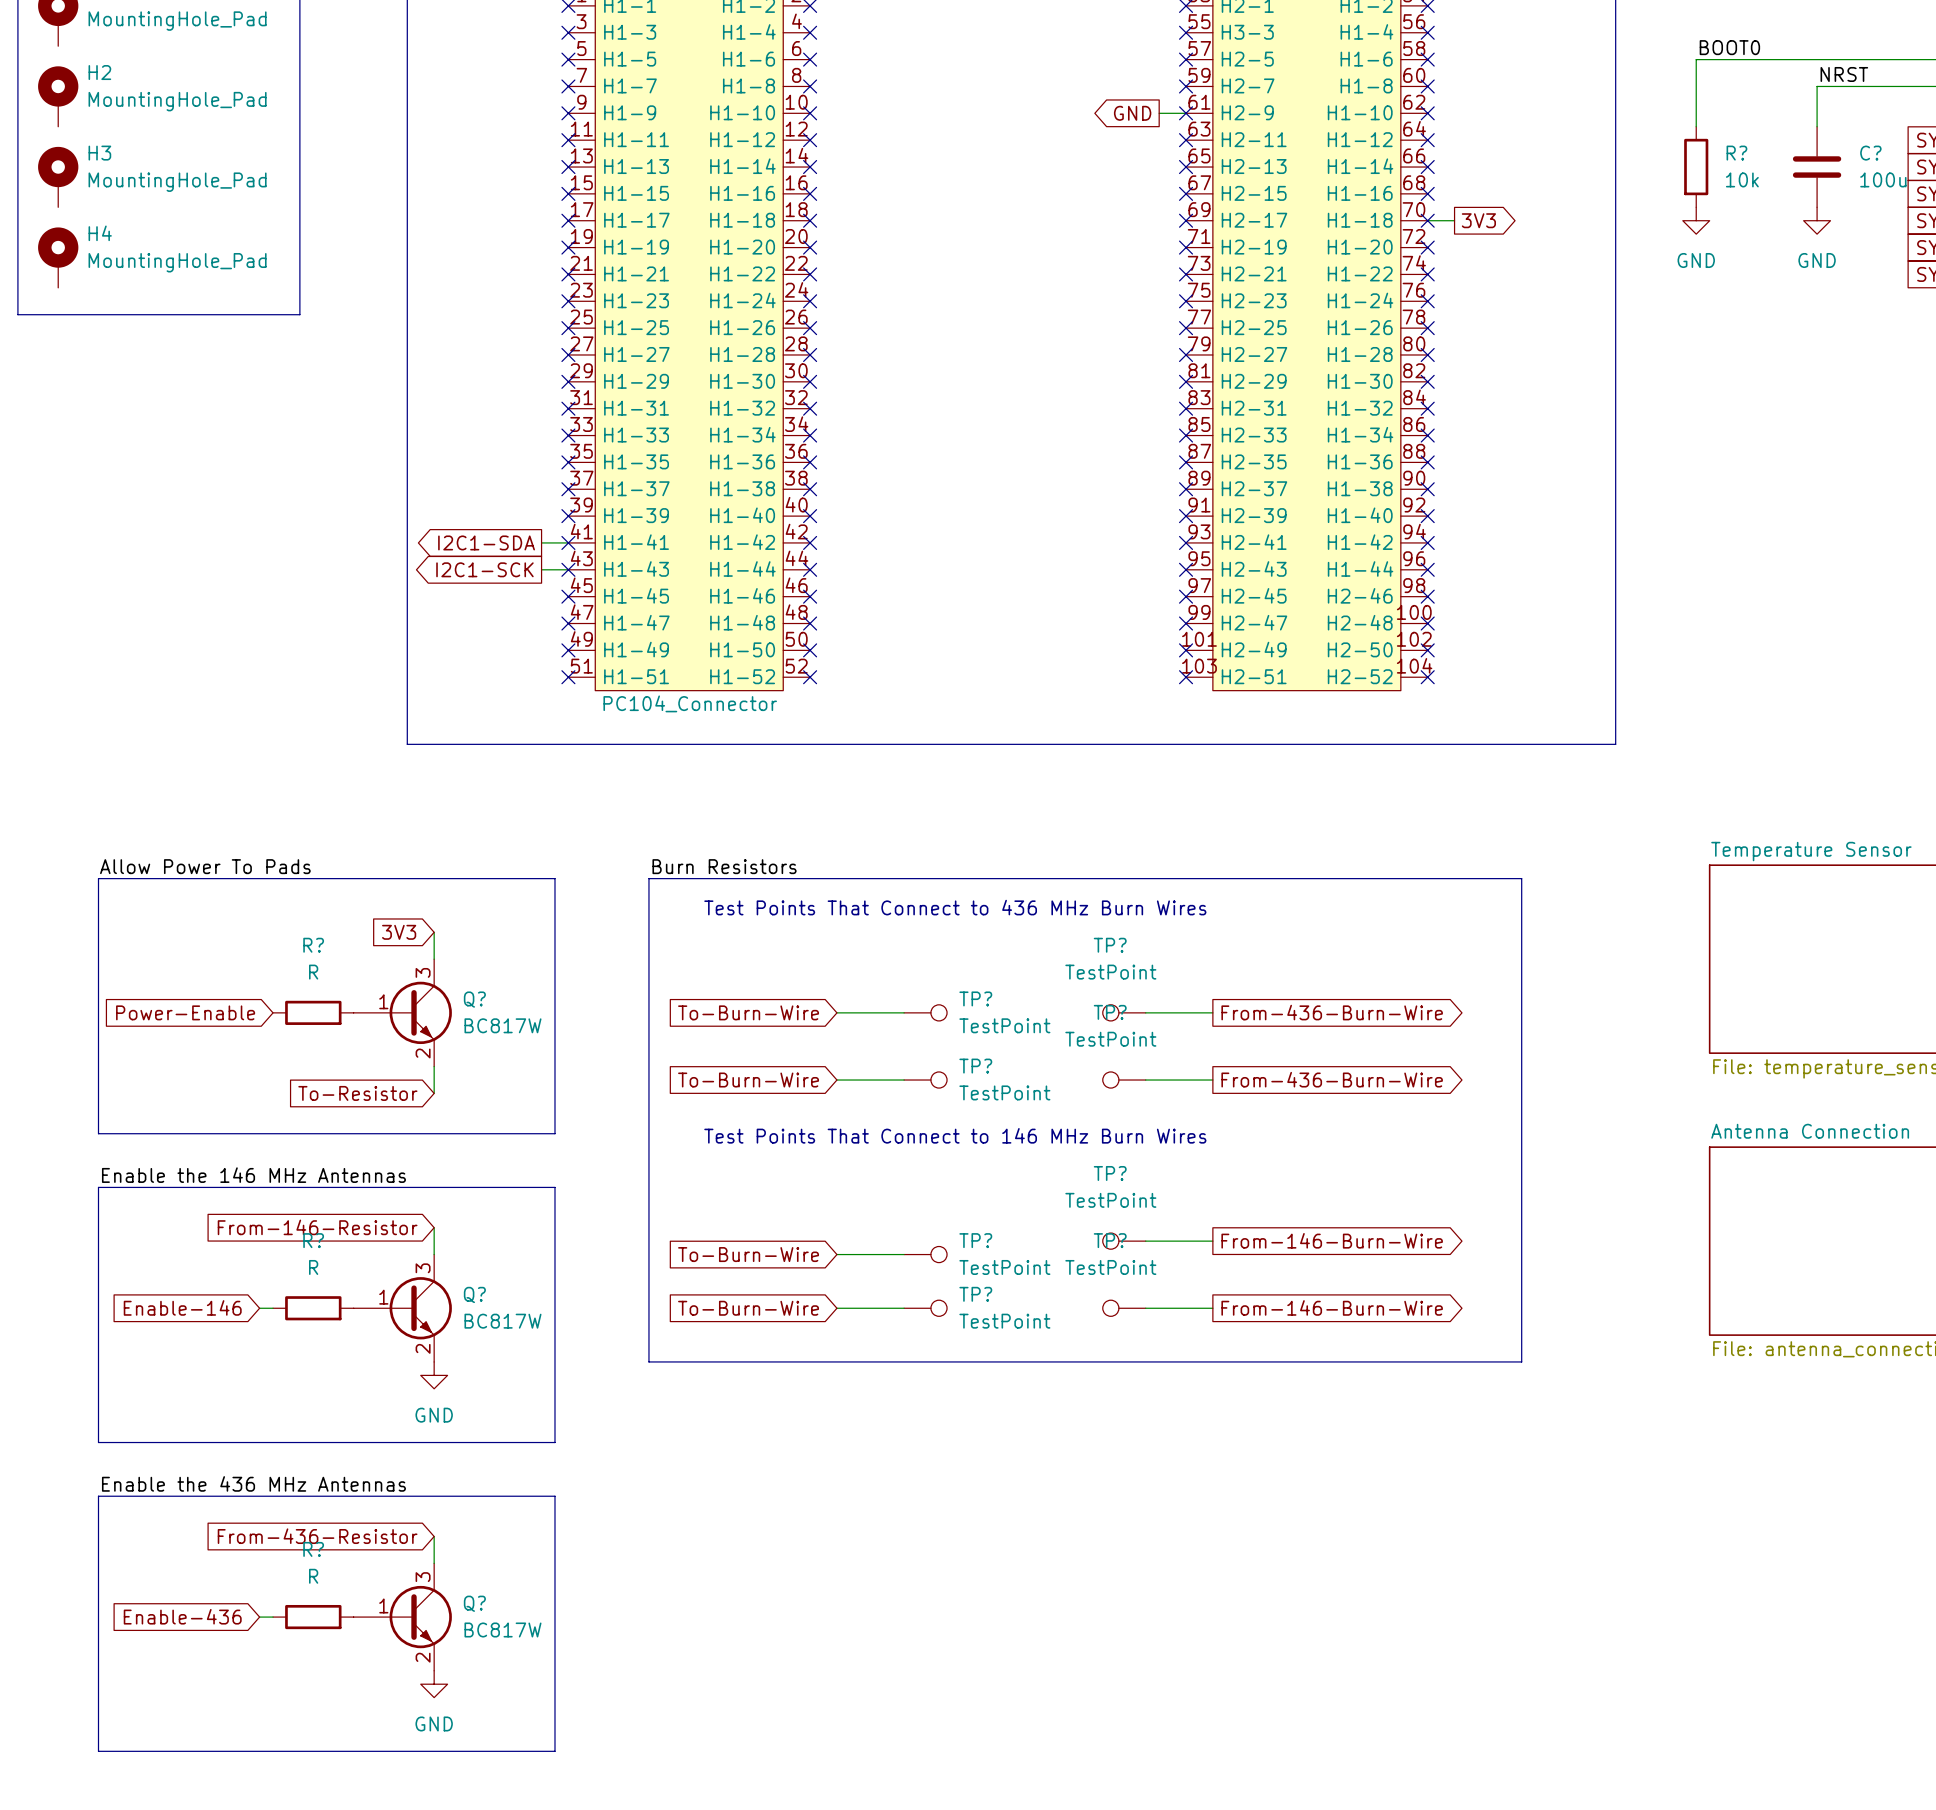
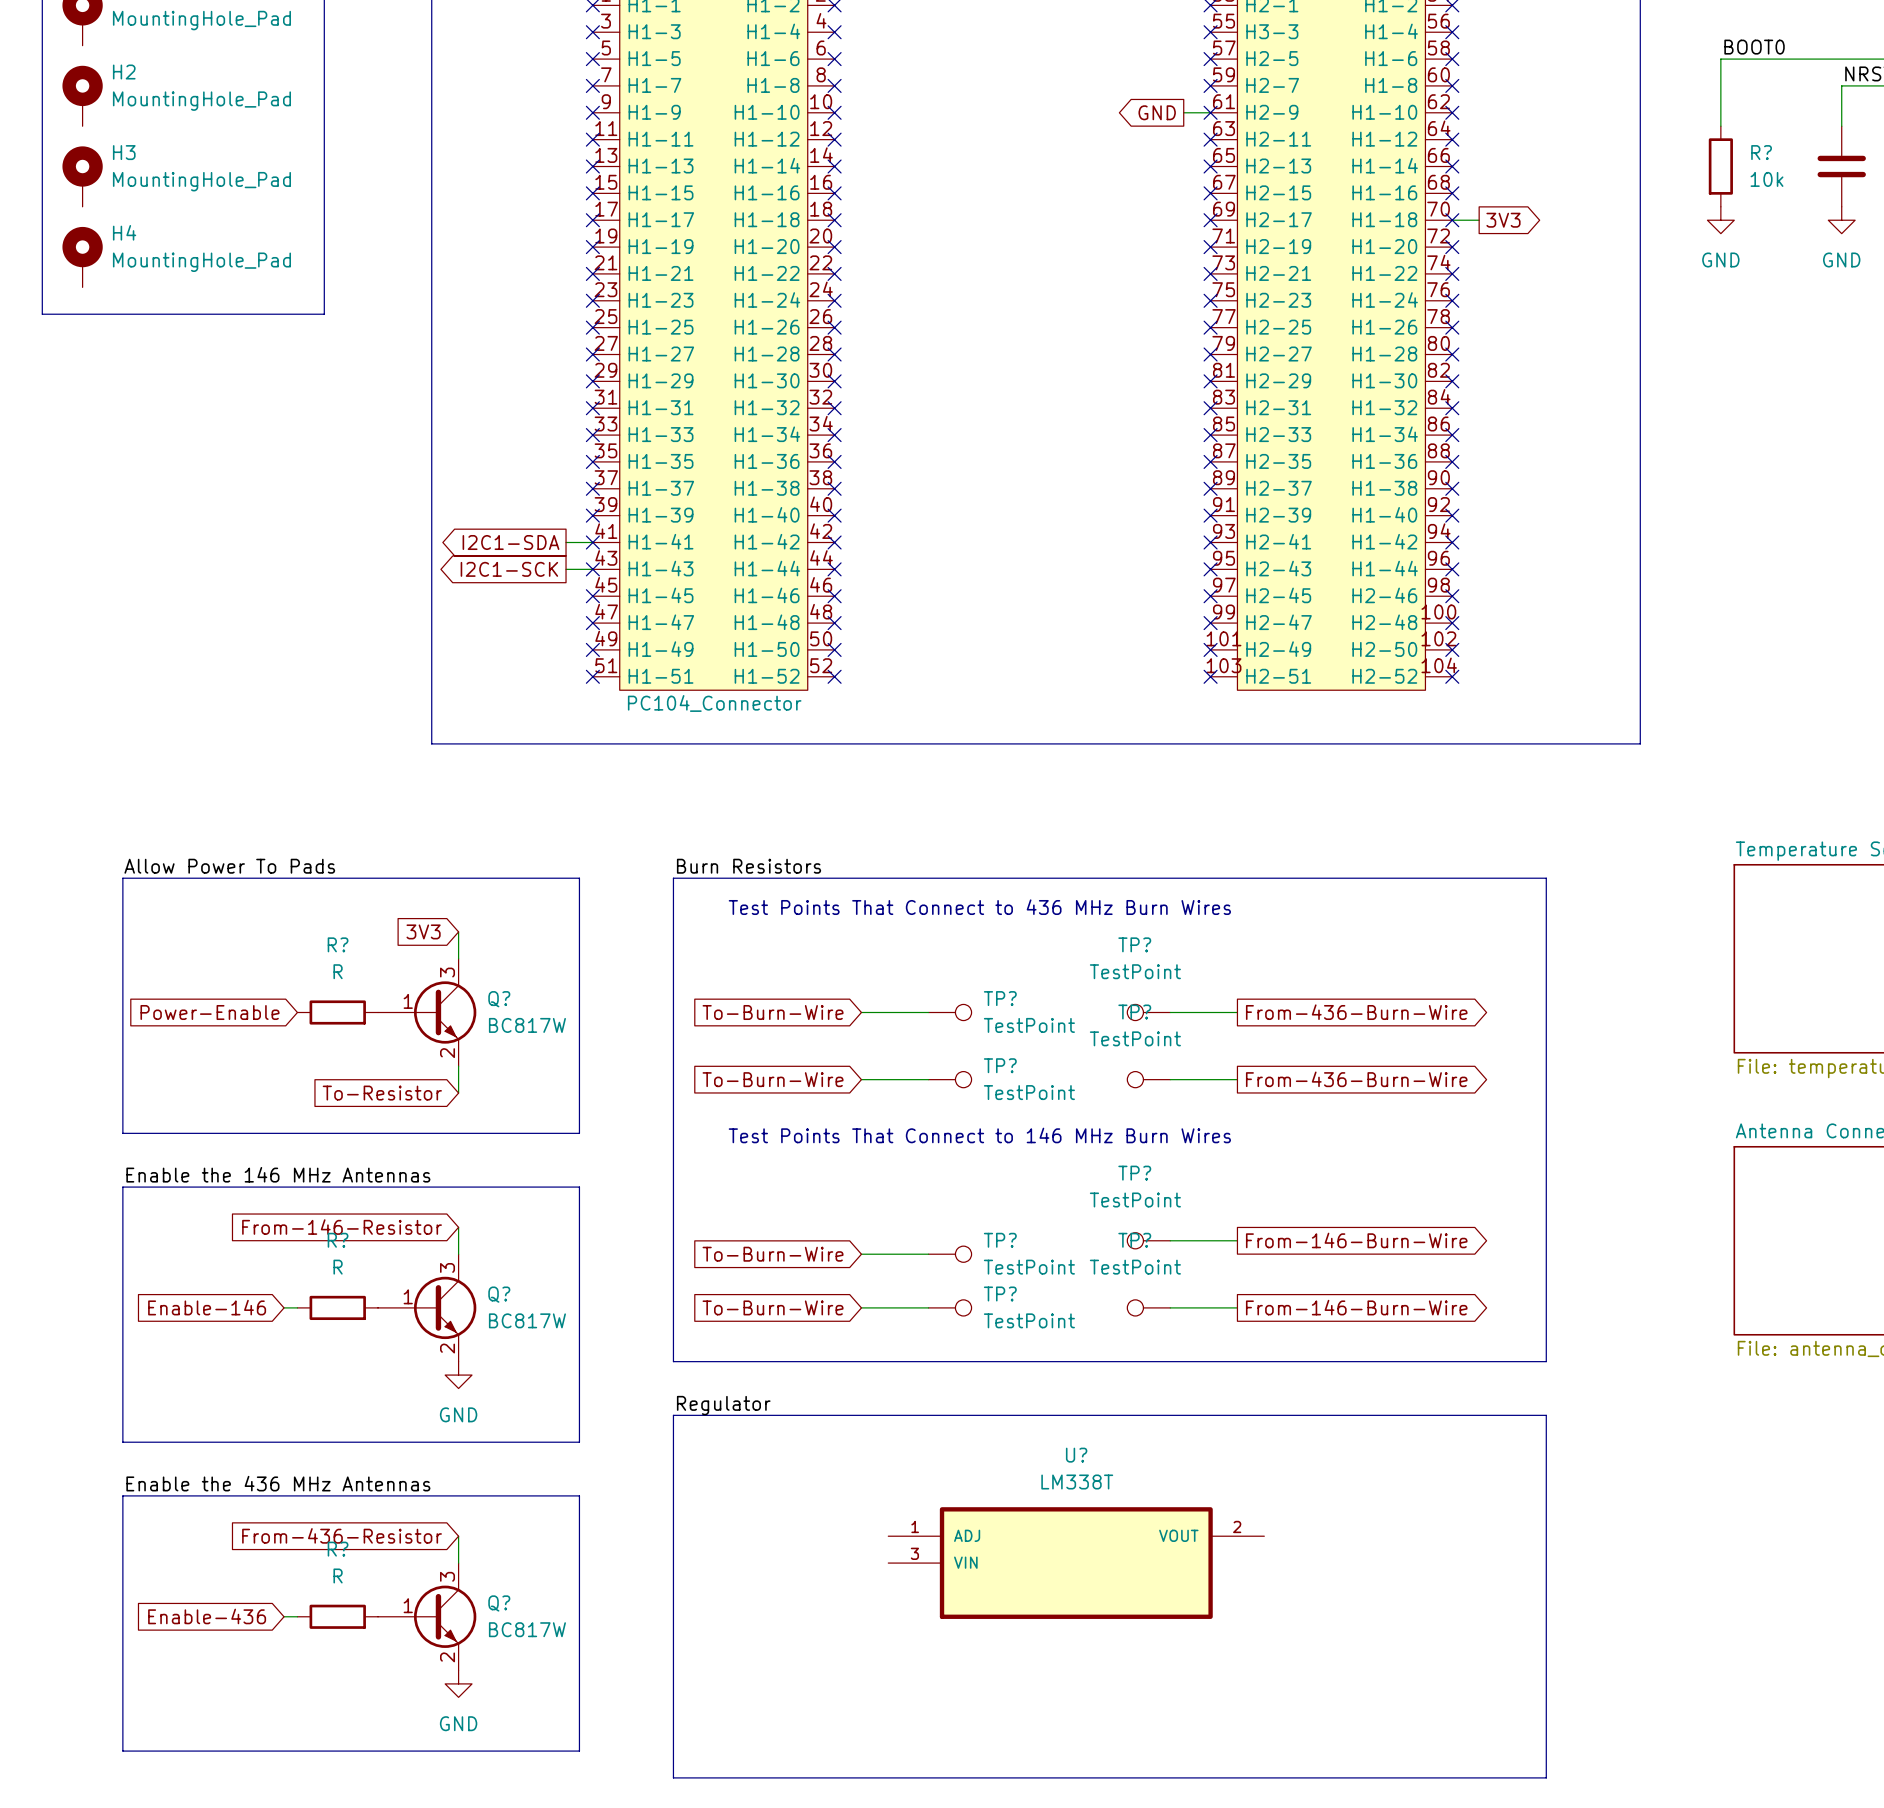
label: none -> Regulator (723, 1405)
line: none -> (673, 1415) (1546, 1415) (1546, 1777) (673, 1777) (673, 1415)
U?: none -> LM338T (1076, 1563)

